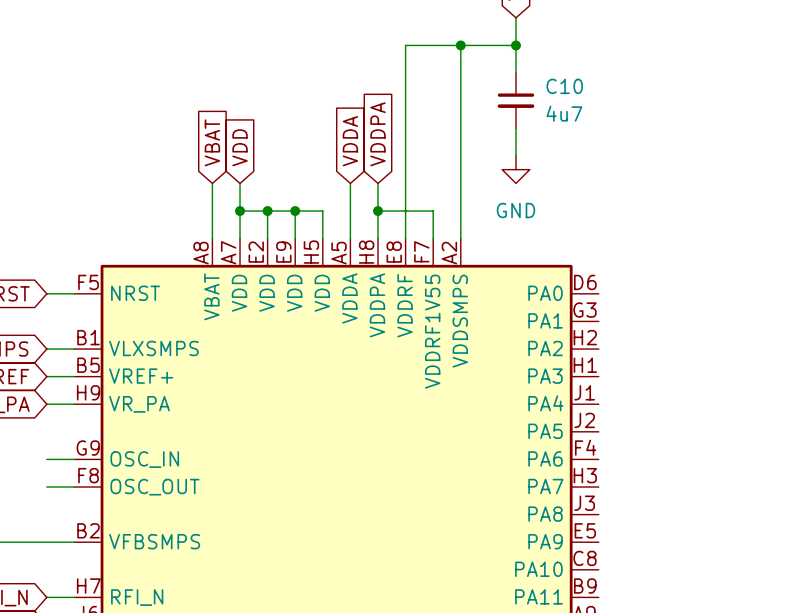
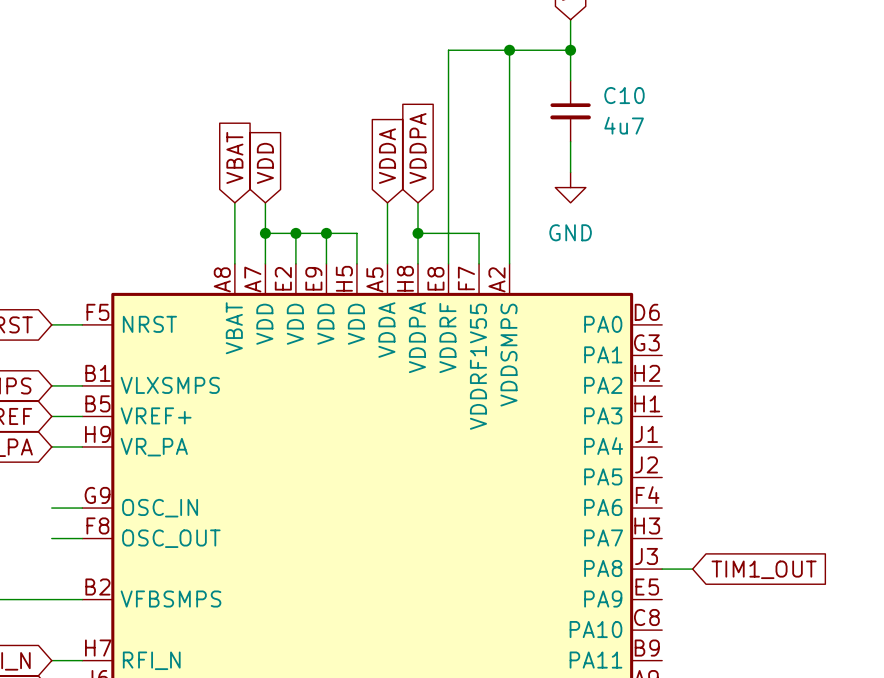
wire: none -> (662, 569) (692, 569)
global label: none -> TIM1_OUT (764, 569)

